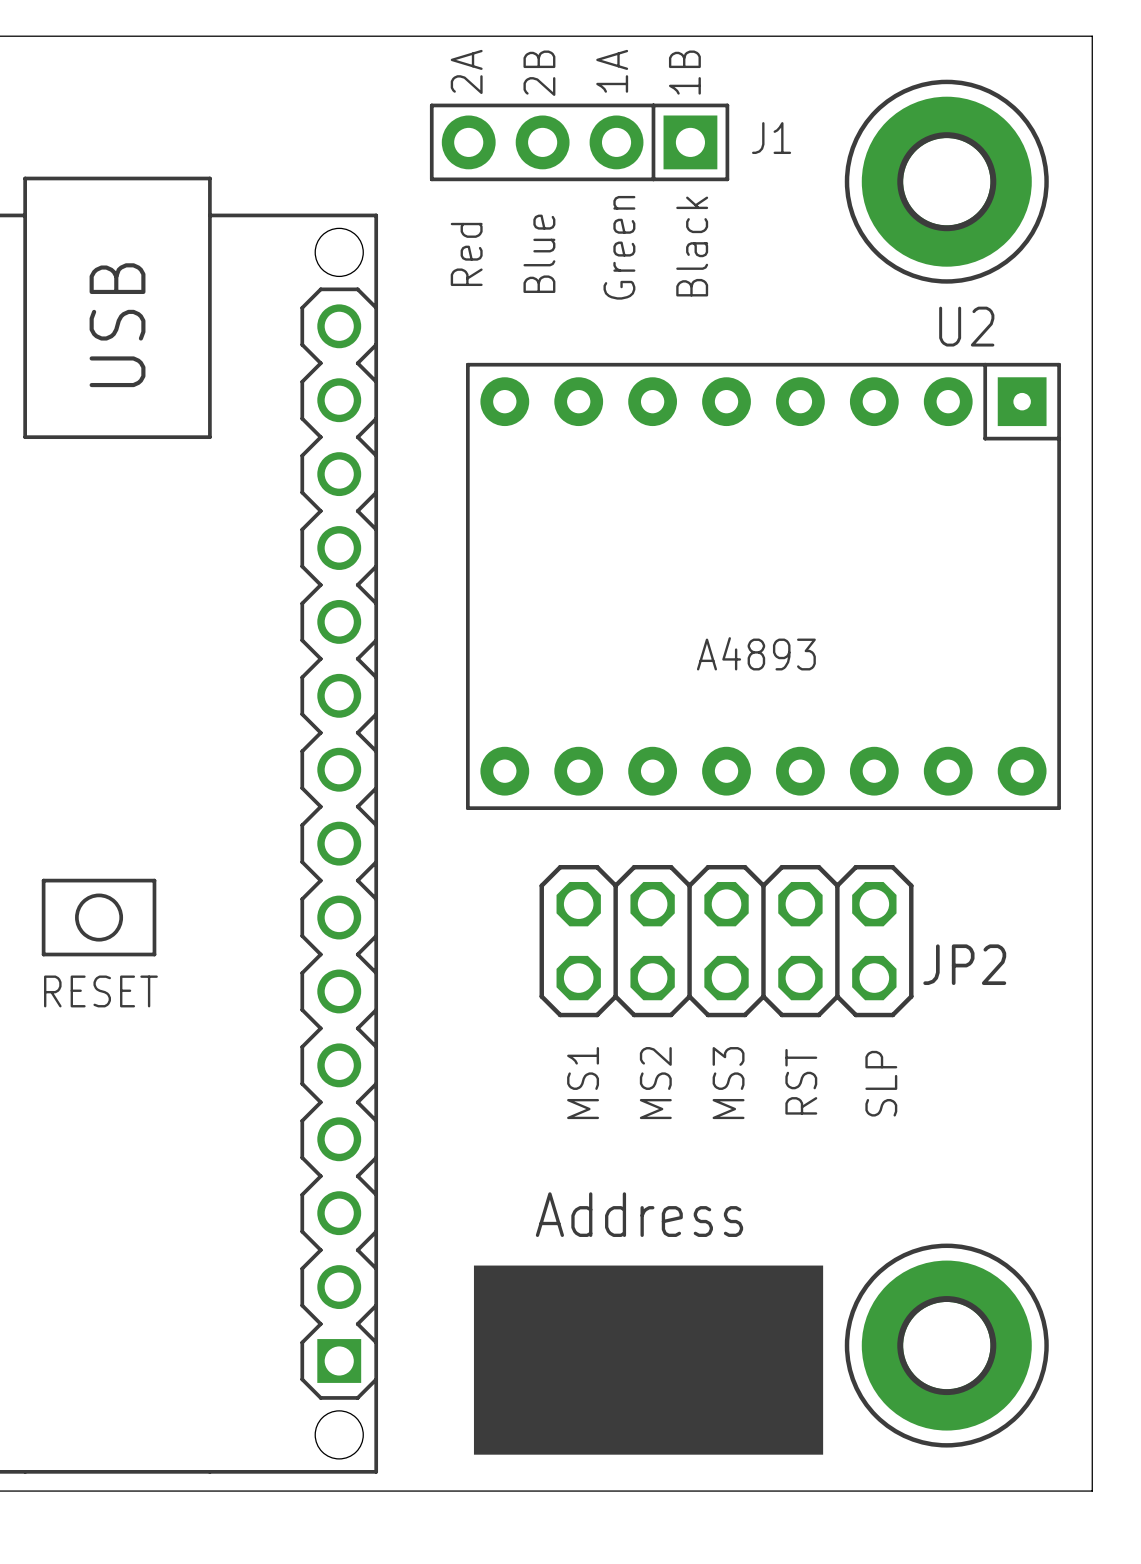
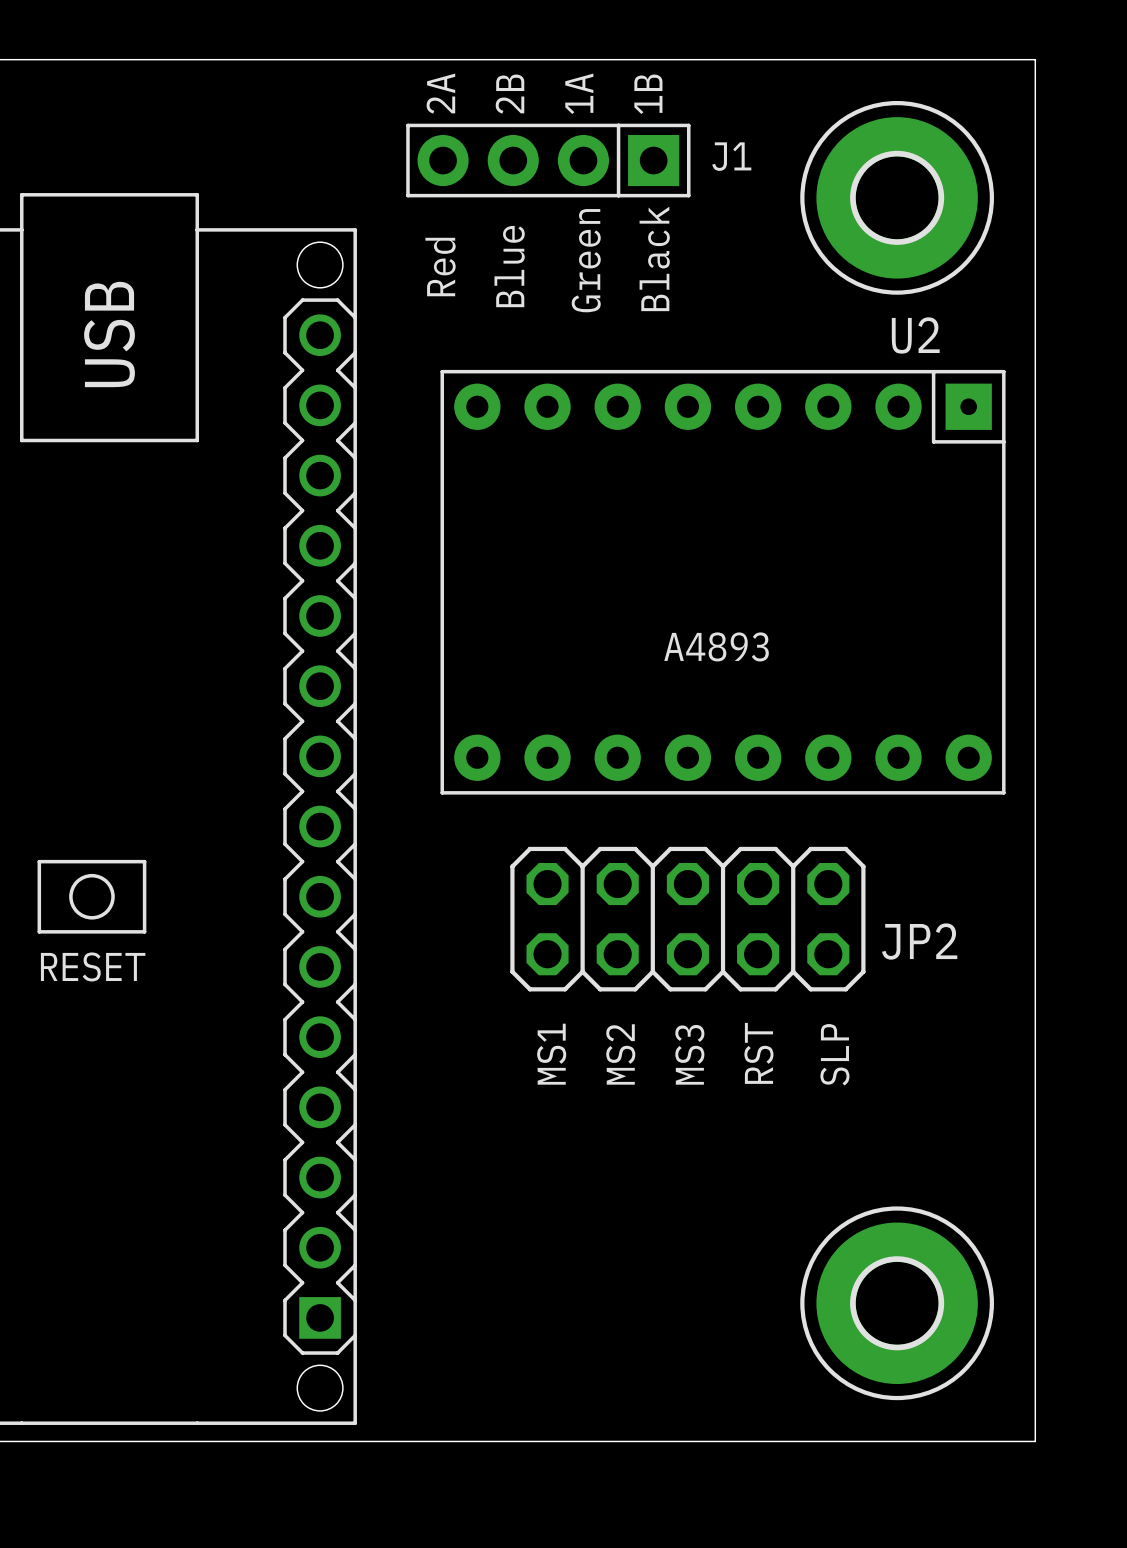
text: Address (639, 1214) -> none
drawing: [473, 1265, 824, 1455] -> none

